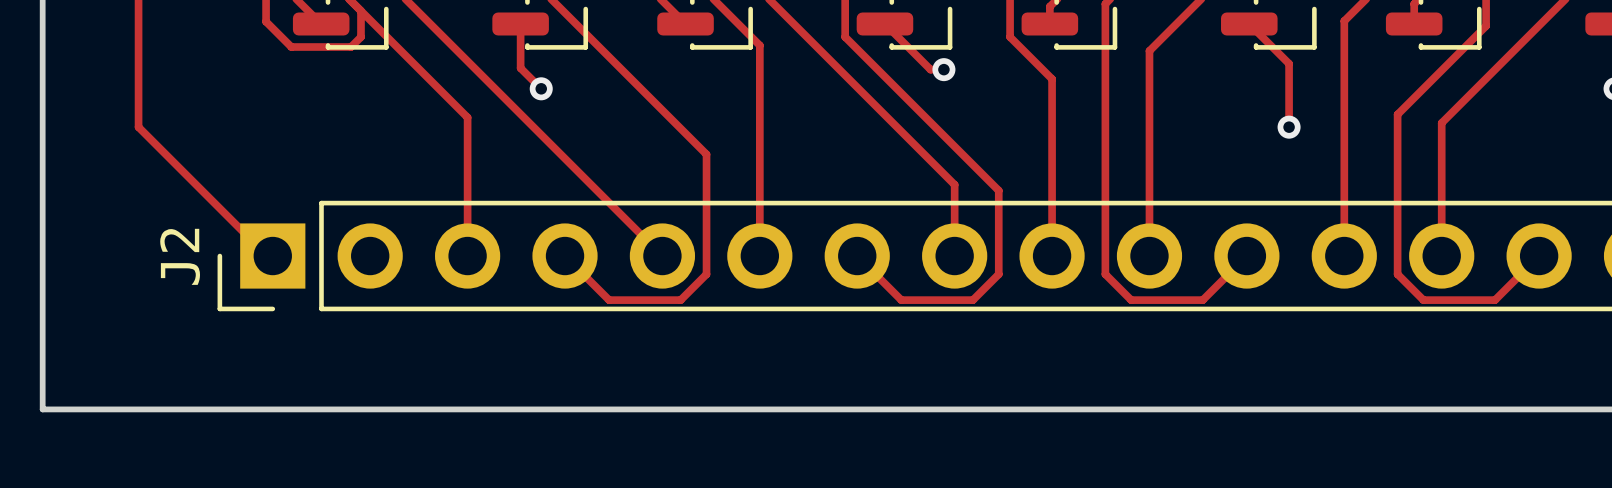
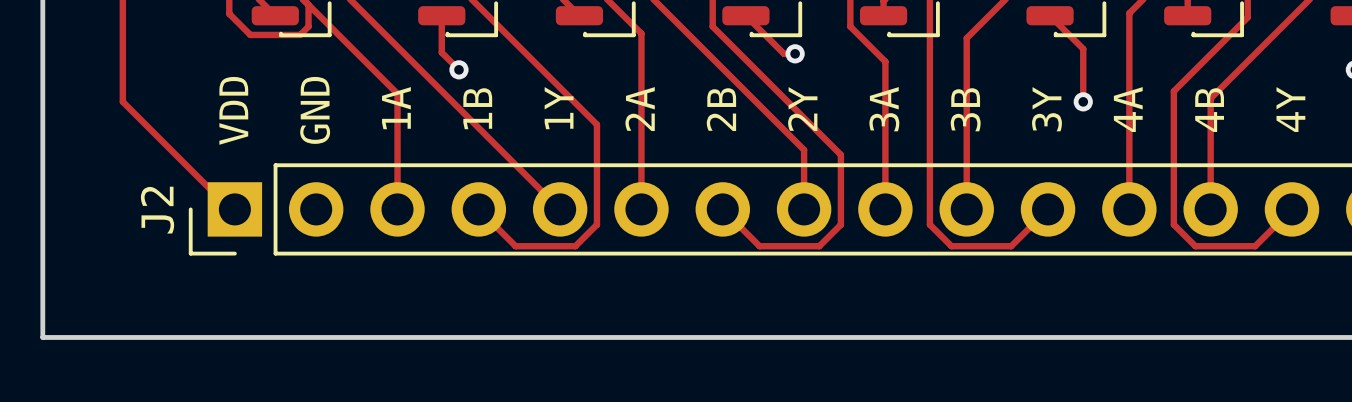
text: none -> 1A (396, 108)
text: none -> 1Y (559, 108)
text: none -> 1B (477, 108)
text: none -> 2A (640, 109)
text: none -> 2Y (802, 109)
text: none -> 3A (884, 109)
text: none -> 3Y (1046, 109)
text: none -> 2B (721, 109)
text: none -> 3B (965, 109)
text: none -> 4A (1128, 109)
text: none -> 4Y (1290, 109)
text: none -> VDD (233, 110)
text: none -> GND (315, 110)
text: none -> 4B (1209, 110)

